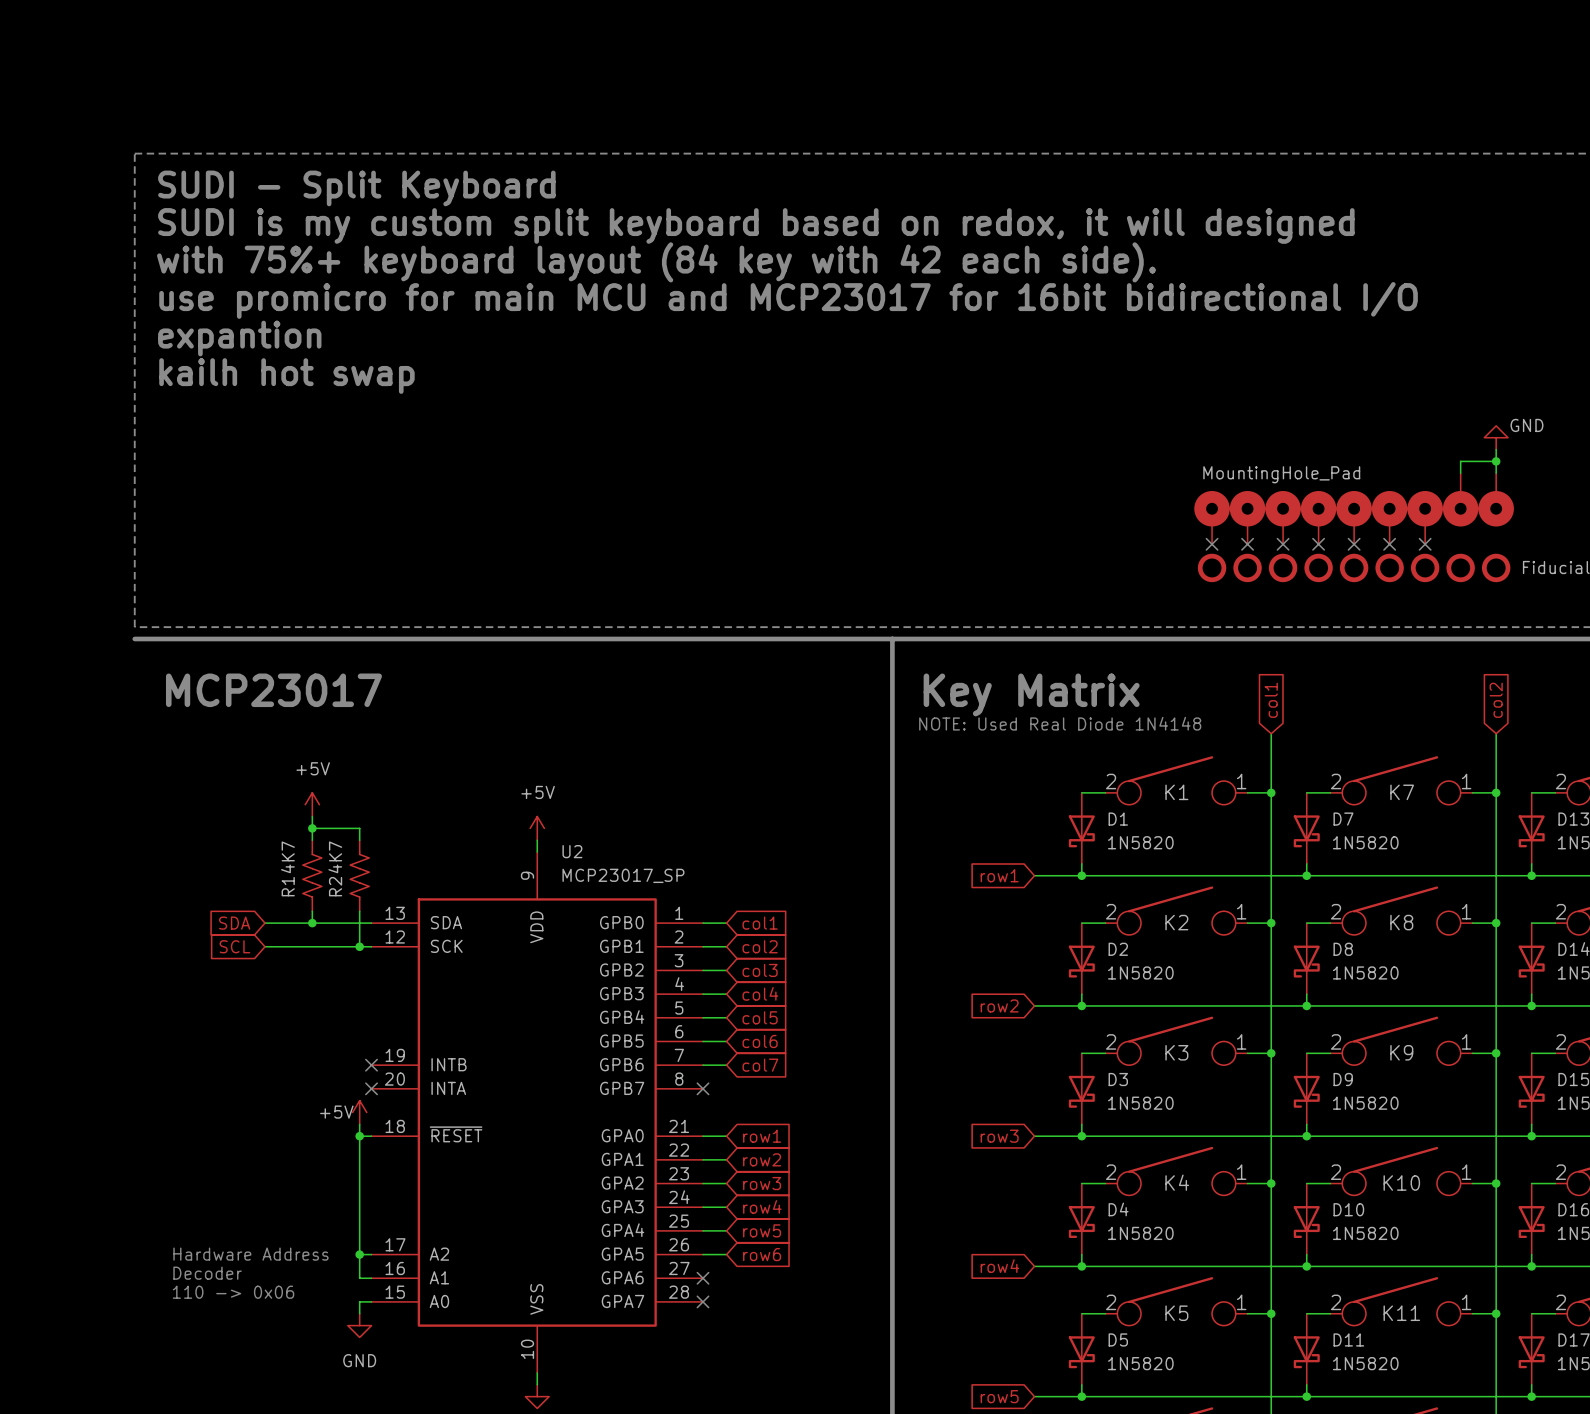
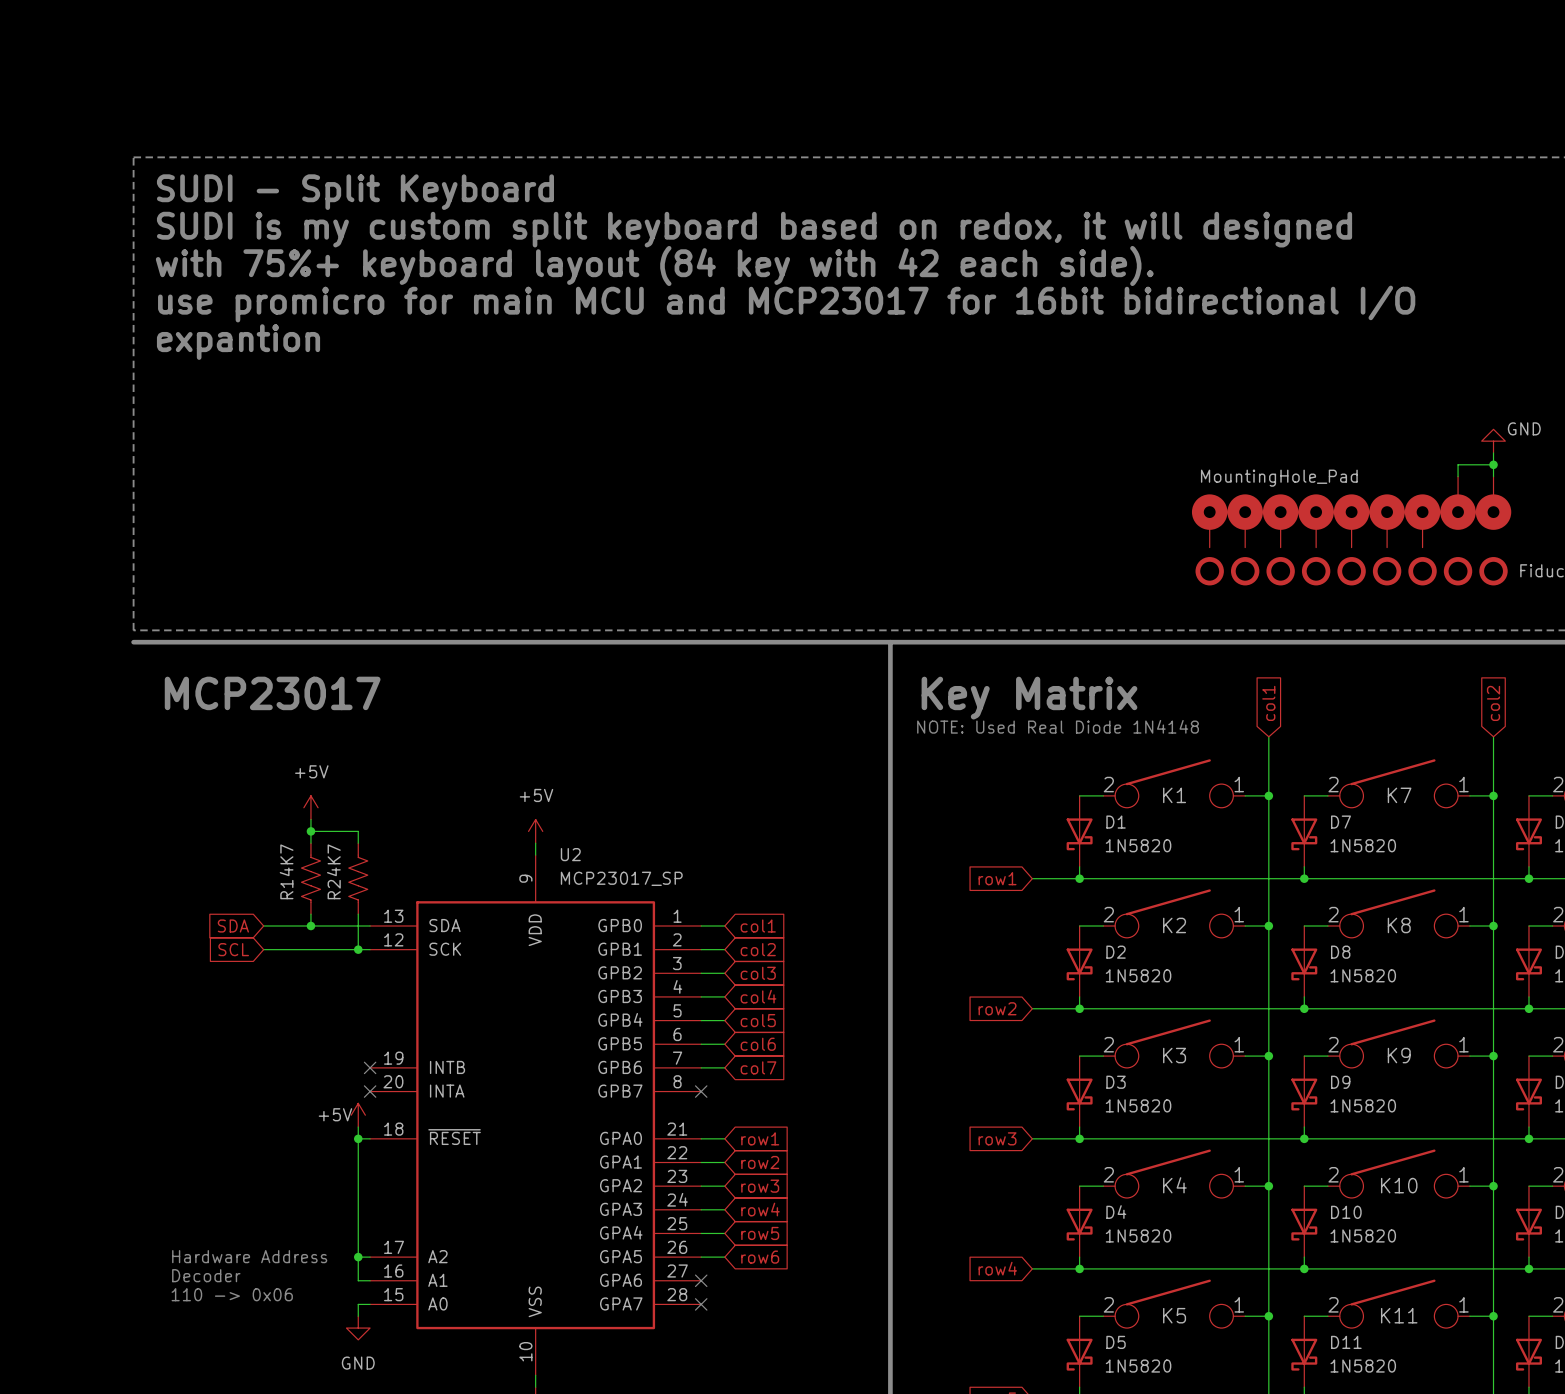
text: kailh hot swap (286, 376) -> none
no-connect mark: (1212, 544) -> none
no-connect mark: (1247, 544) -> none
no-connect mark: (1283, 544) -> none
no-connect mark: (1318, 544) -> none
no-connect mark: (1354, 544) -> none
no-connect mark: (1389, 544) -> none
no-connect mark: (1425, 544) -> none

